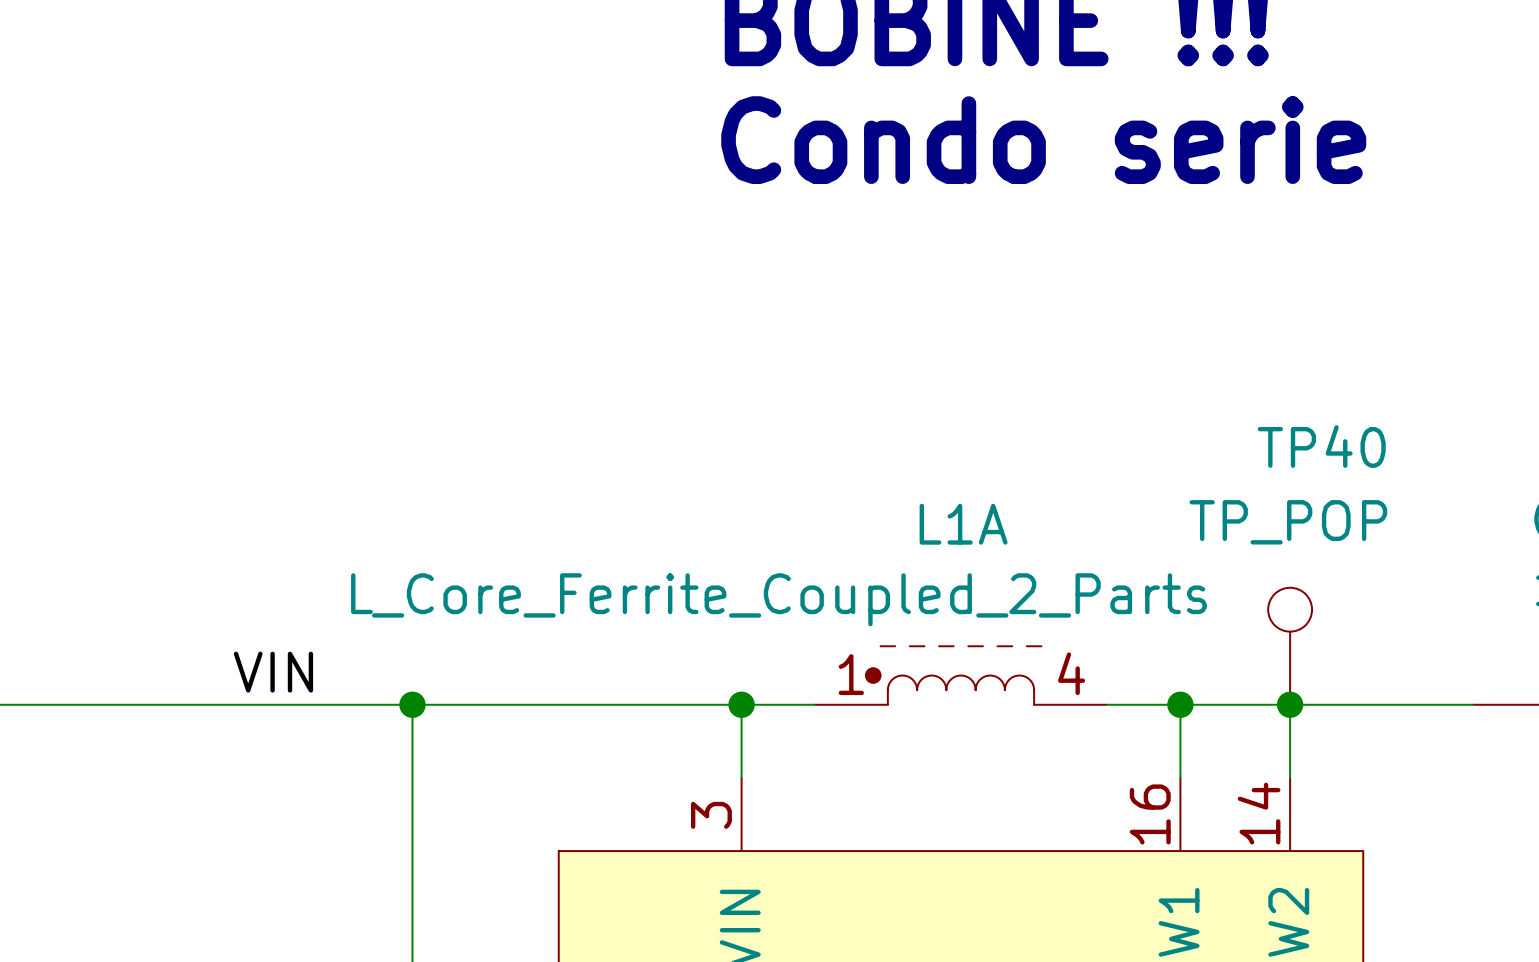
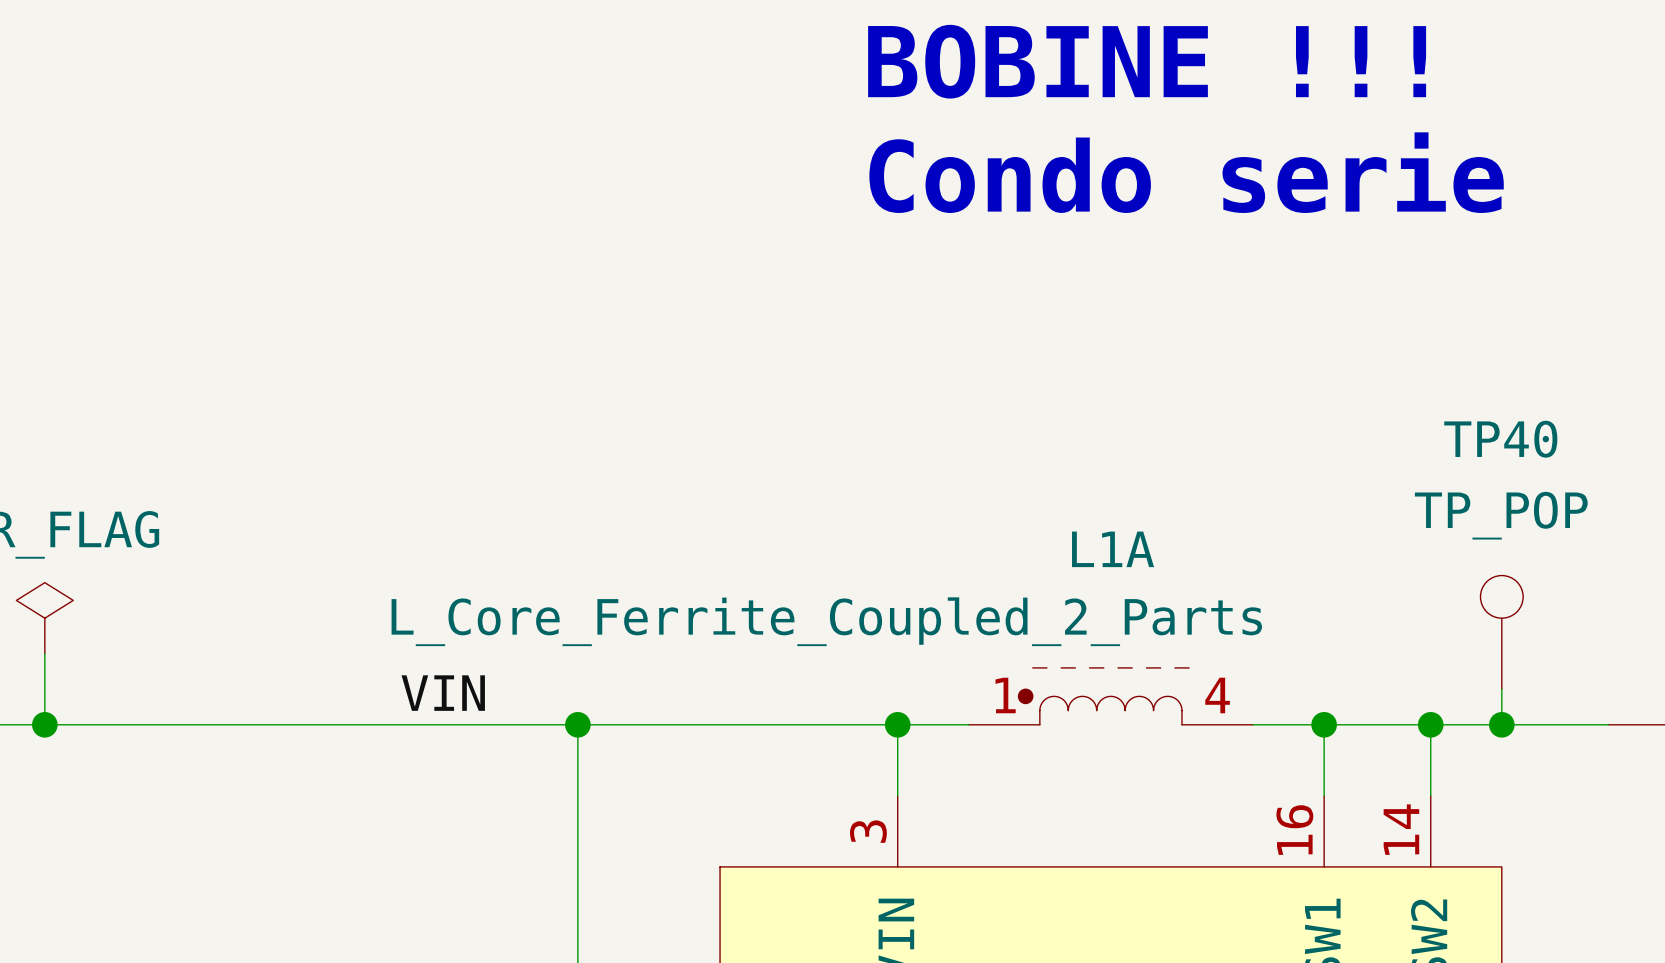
TP40 name position: TP40 (1321, 446) -> TP40 (1500, 439)
L1A value position: L_Core_Ferrite_Coupled_2_Parts (779, 599) -> L_Core_Ferrite_Coupled_2_Parts (826, 621)
TP40 position: (1290, 646) -> (1501, 632)
wire: none -> (1501, 689) (1501, 724)
junction: none -> (1501, 724)

